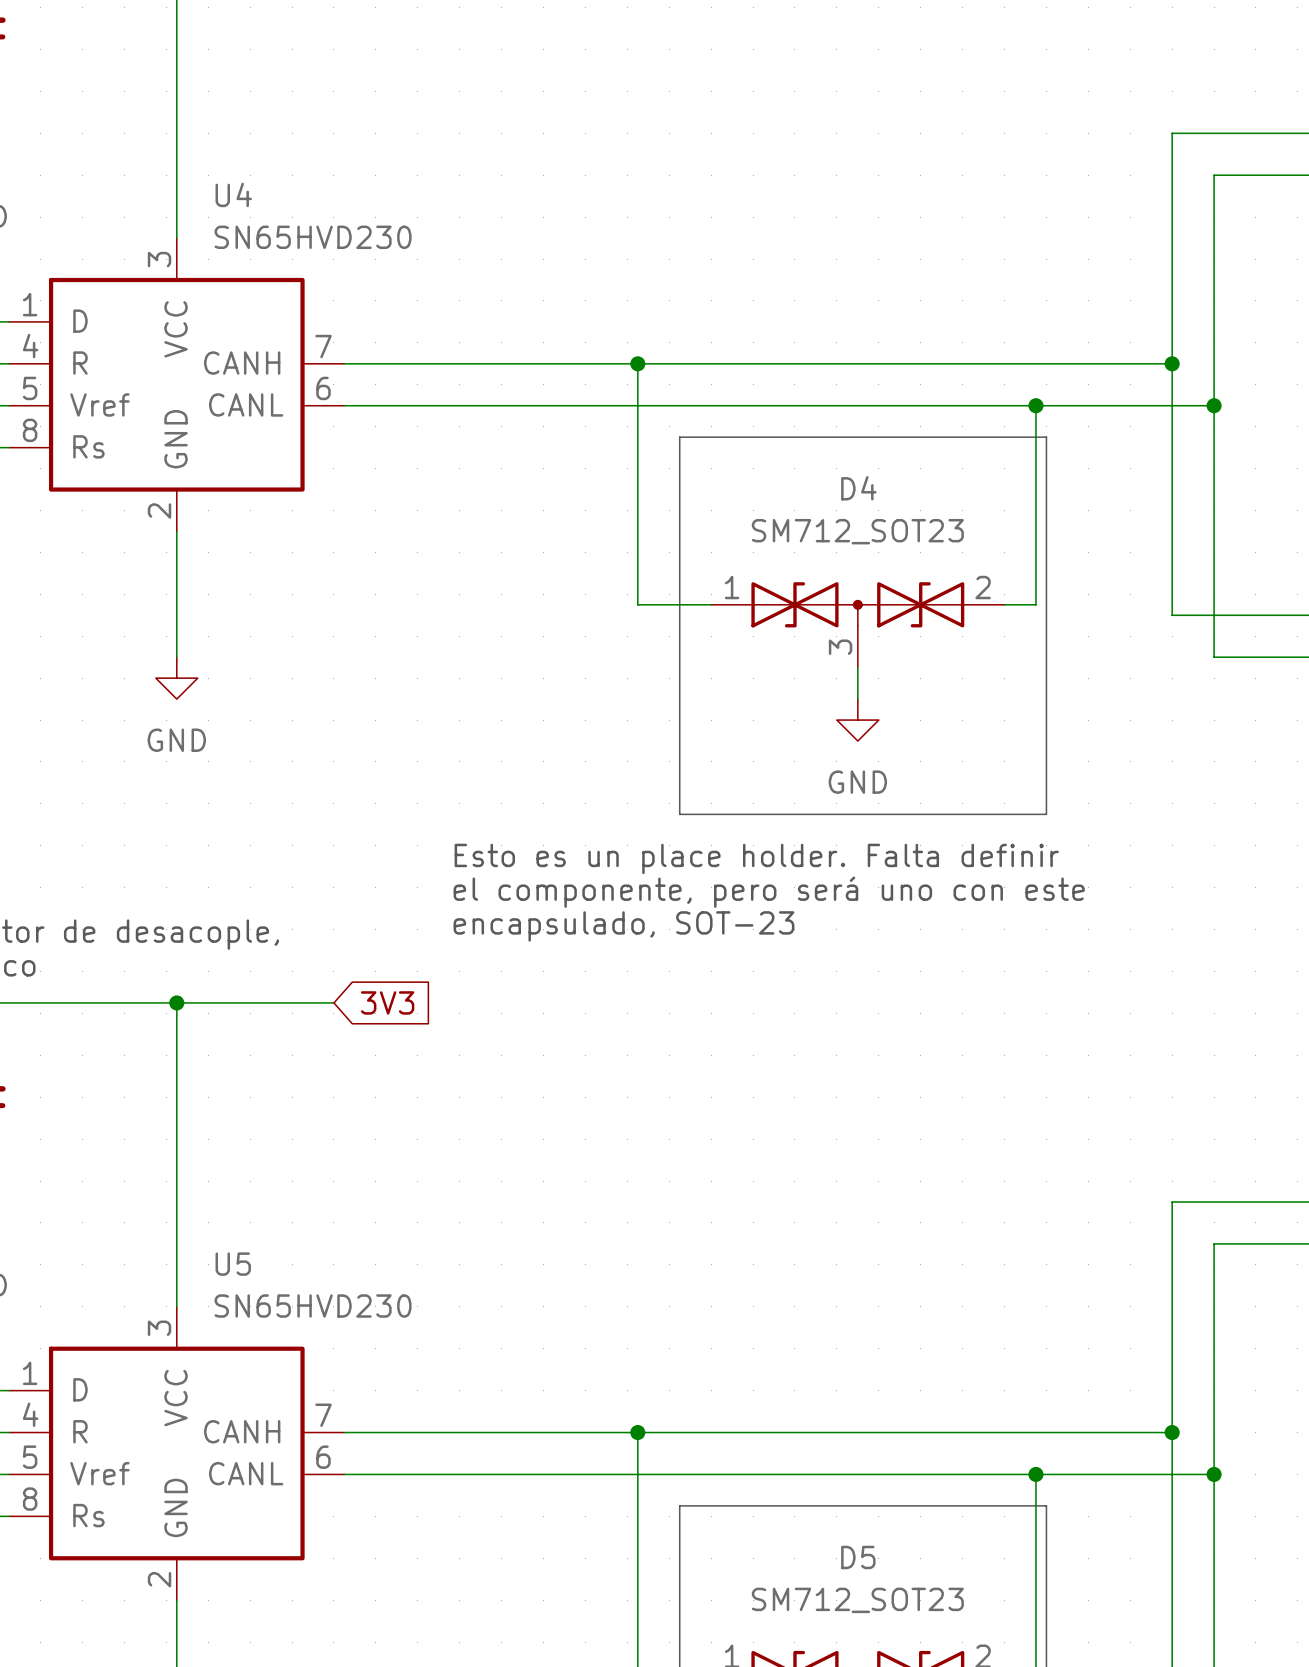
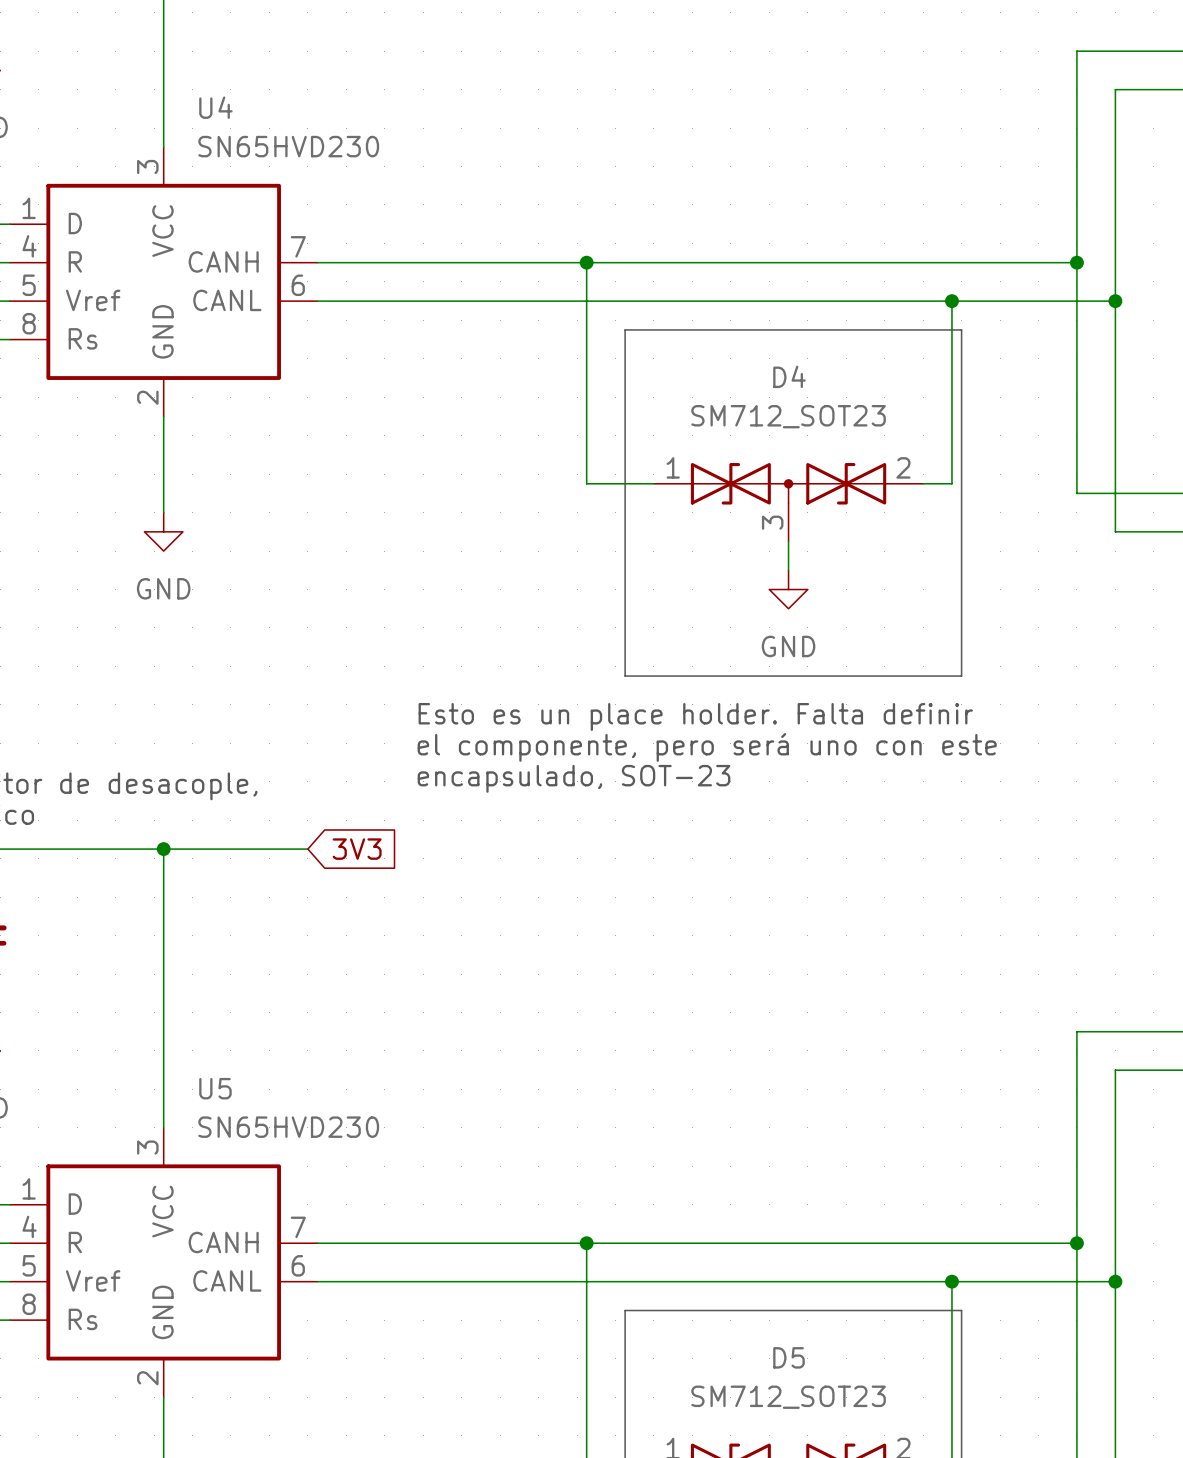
power symbol position: GND (176, 678) -> GND (163, 531)

